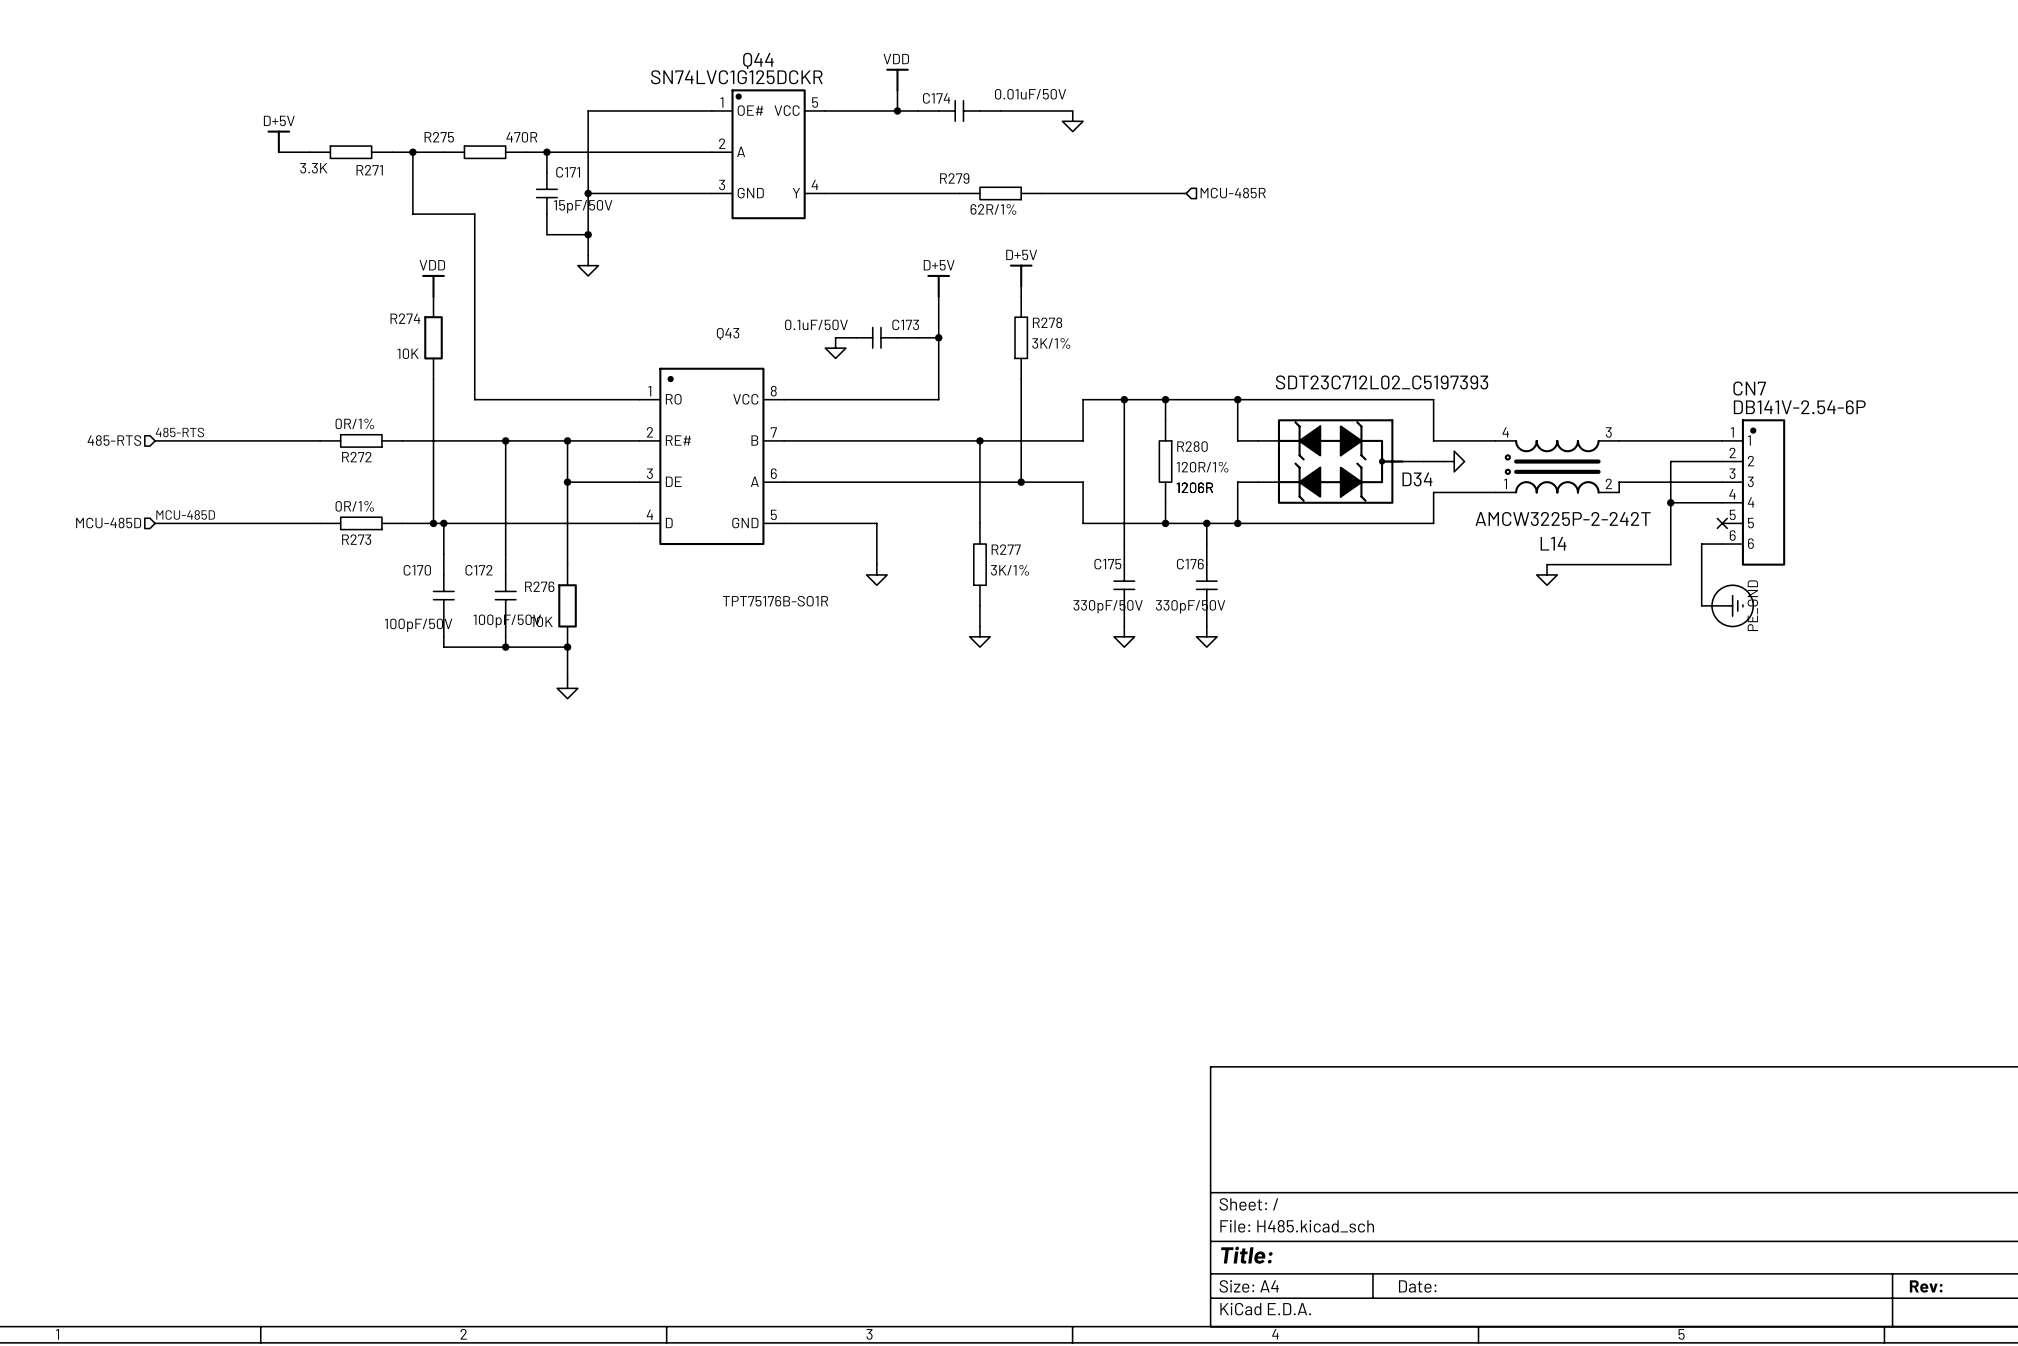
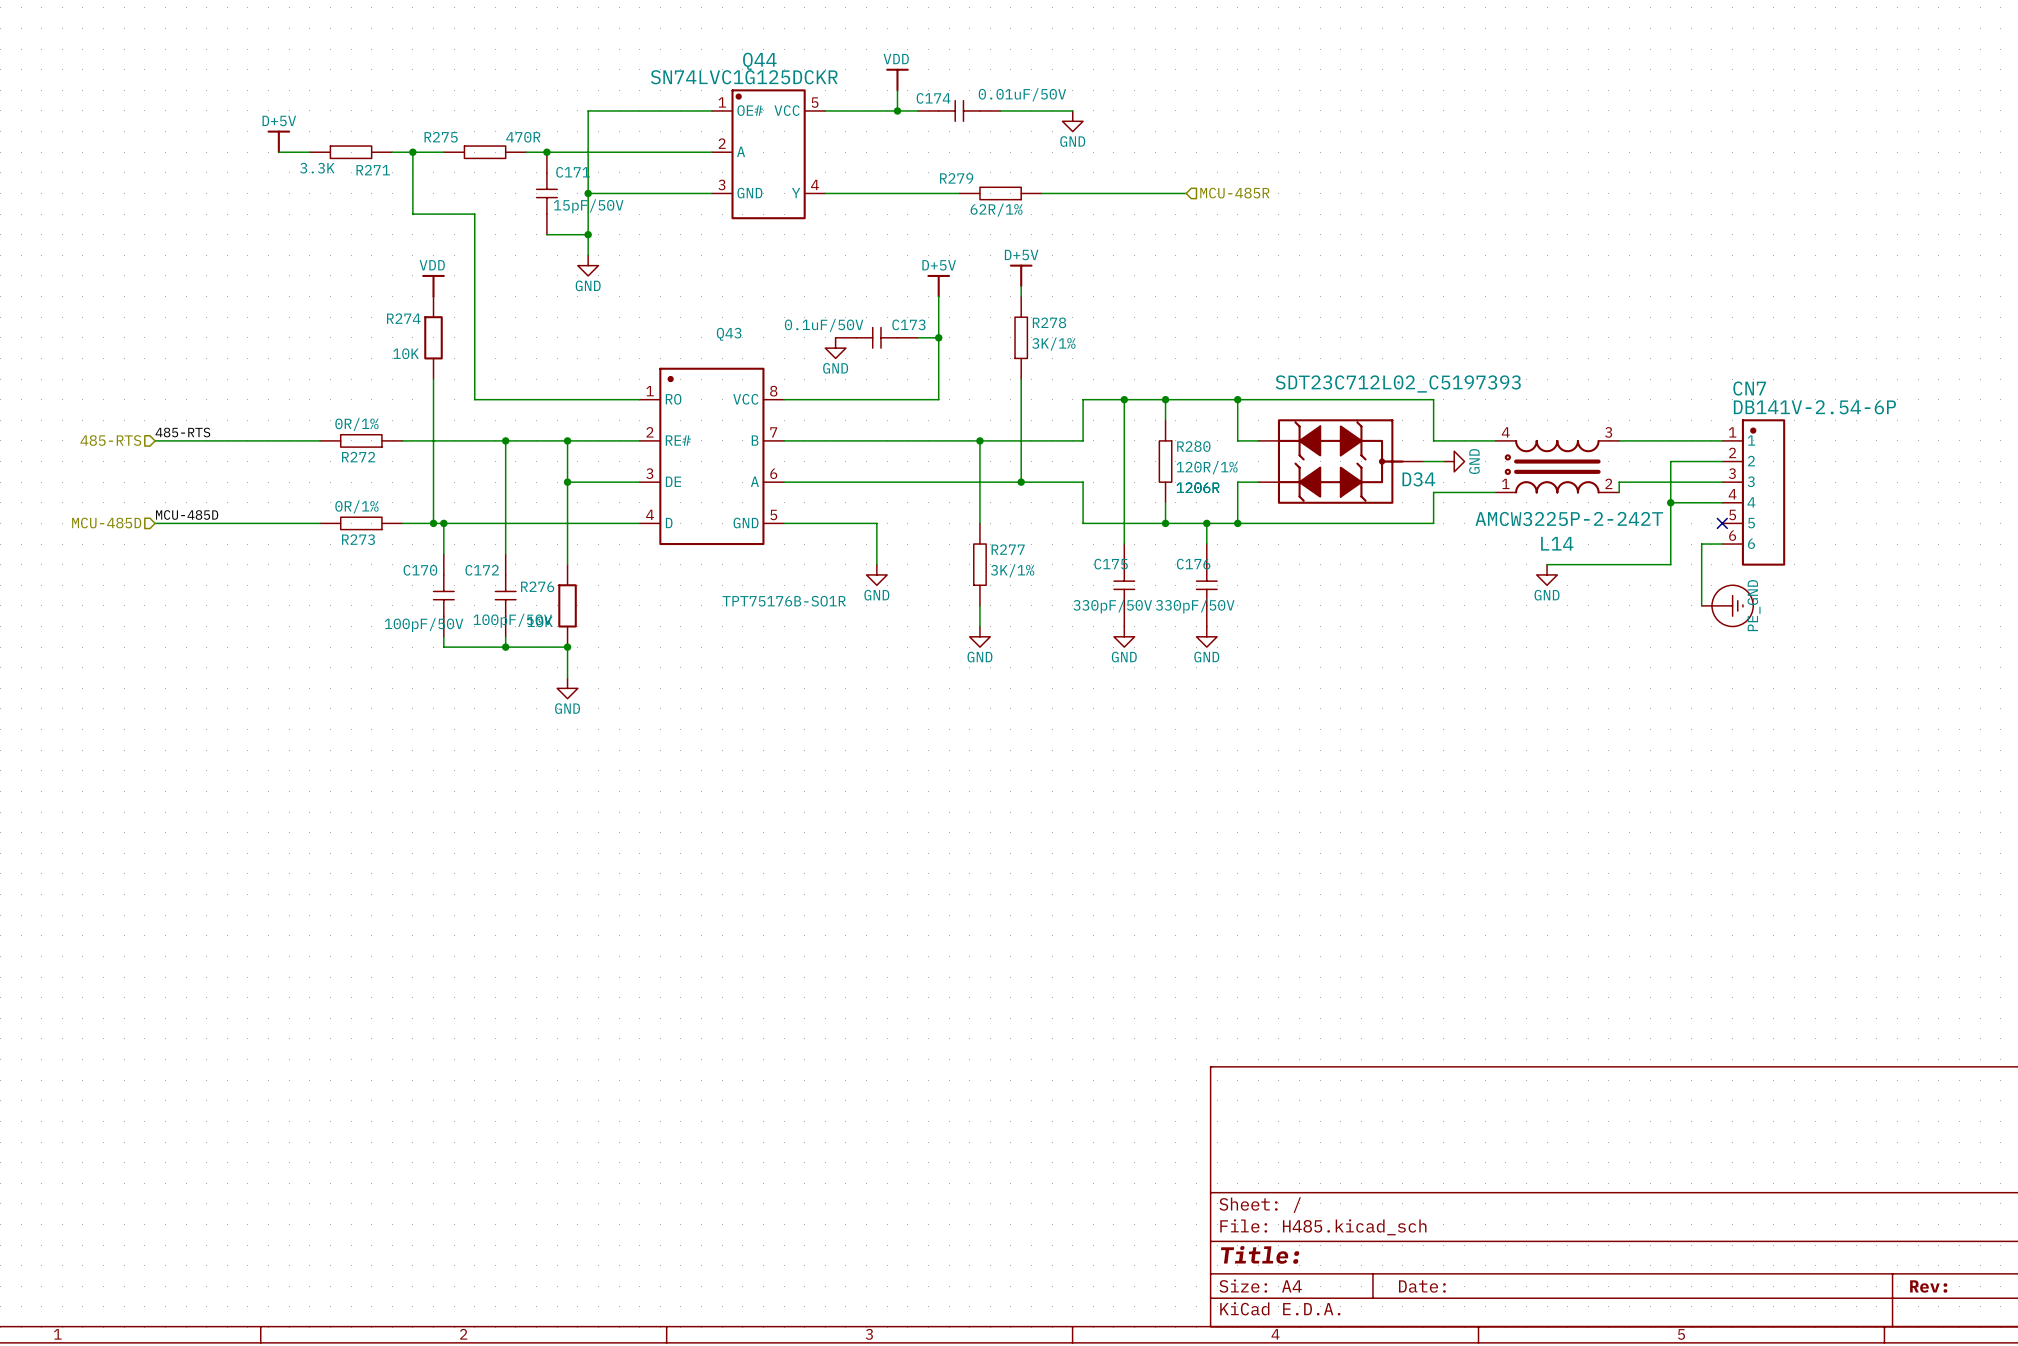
power symbol text: none -> GND (1072, 141)
power symbol text: none -> GND (588, 285)
power symbol text: none -> GND (835, 368)
power symbol text: none -> GND (1474, 461)
power symbol text: none -> GND (876, 595)
power symbol text: none -> GND (1547, 595)
power symbol text: none -> GND (979, 657)
power symbol text: none -> GND (1124, 657)
power symbol text: none -> GND (1206, 657)
power symbol text: none -> GND (567, 708)

